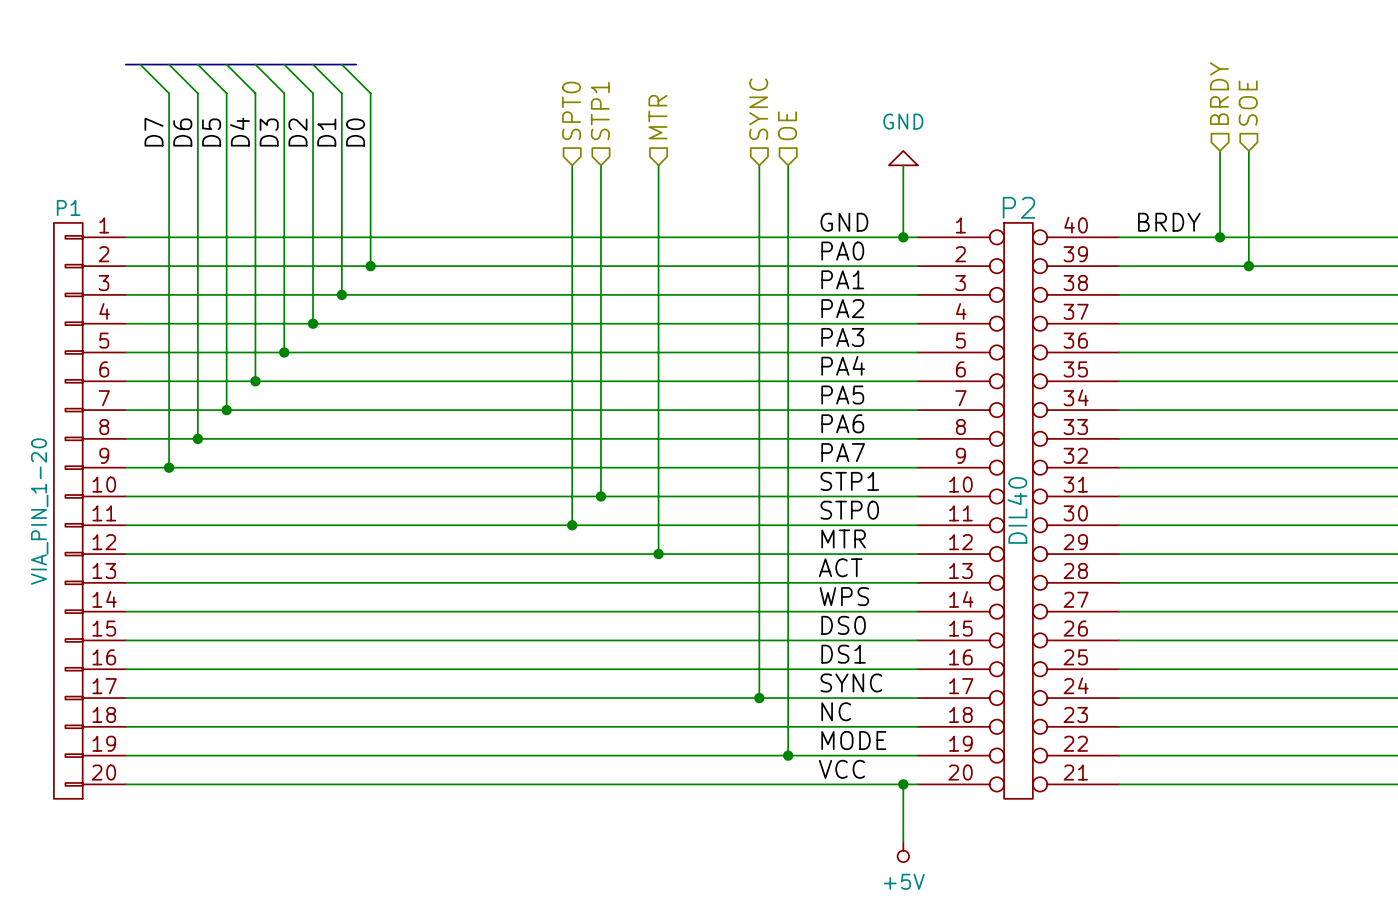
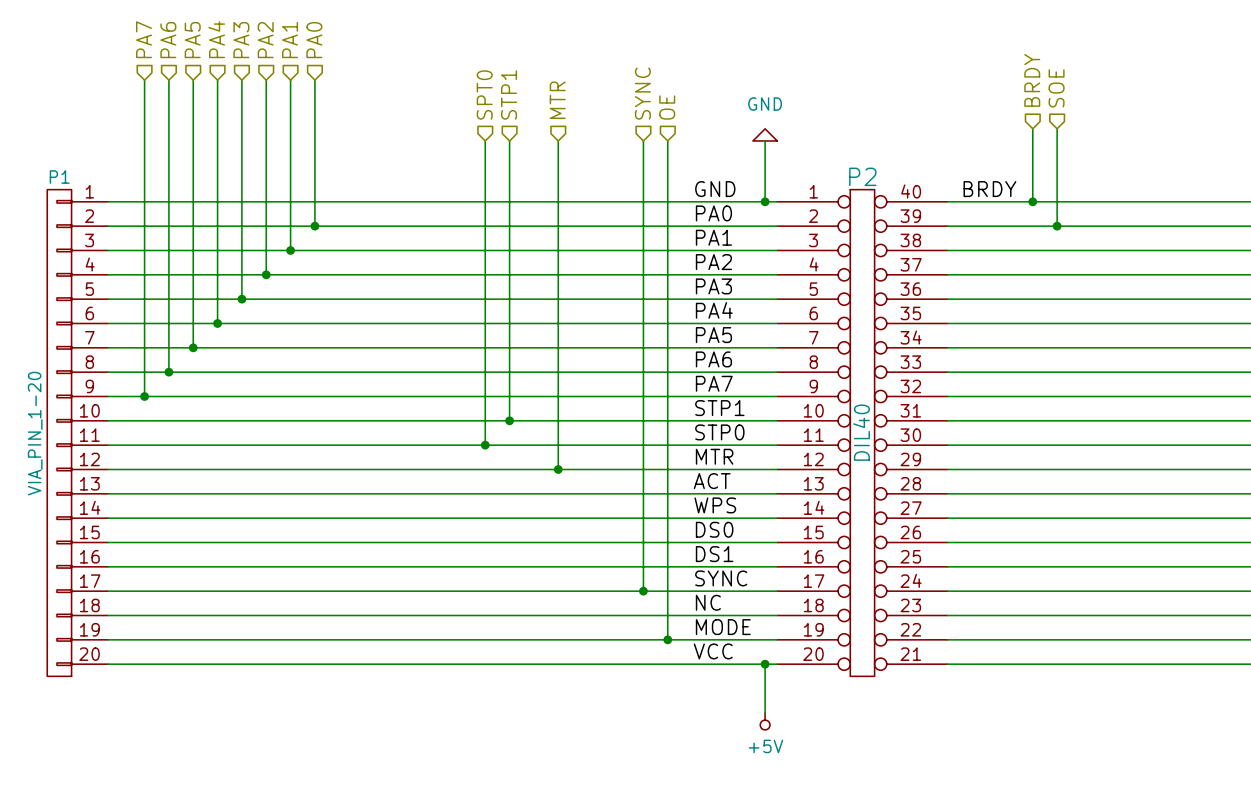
hierarchical label: none -> PA7 (144, 39)
hierarchical label: none -> PA6 (168, 40)
hierarchical label: none -> PA5 (192, 40)
hierarchical label: none -> PA4 (216, 39)
hierarchical label: none -> PA3 (241, 40)
hierarchical label: none -> PA2 (265, 40)
hierarchical label: none -> PA1 (290, 40)
hierarchical label: none -> PA0 (314, 40)
bus: (125, 64) (356, 64) -> none
wire: (140, 64) (169, 93) -> none
wire: (169, 64) (197, 93) -> none
wire: (197, 64) (226, 93) -> none
wire: (226, 64) (255, 93) -> none
wire: (255, 64) (284, 93) -> none
wire: (284, 64) (313, 93) -> none
wire: (313, 64) (341, 93) -> none
wire: (341, 64) (370, 93) -> none
label: D7 (154, 132) -> none
label: D6 (182, 132) -> none
label: D5 (211, 132) -> none
label: D4 (239, 132) -> none
label: D3 (269, 132) -> none
label: D2 (297, 132) -> none
label: D1 (326, 132) -> none
label: D0 (355, 132) -> none

